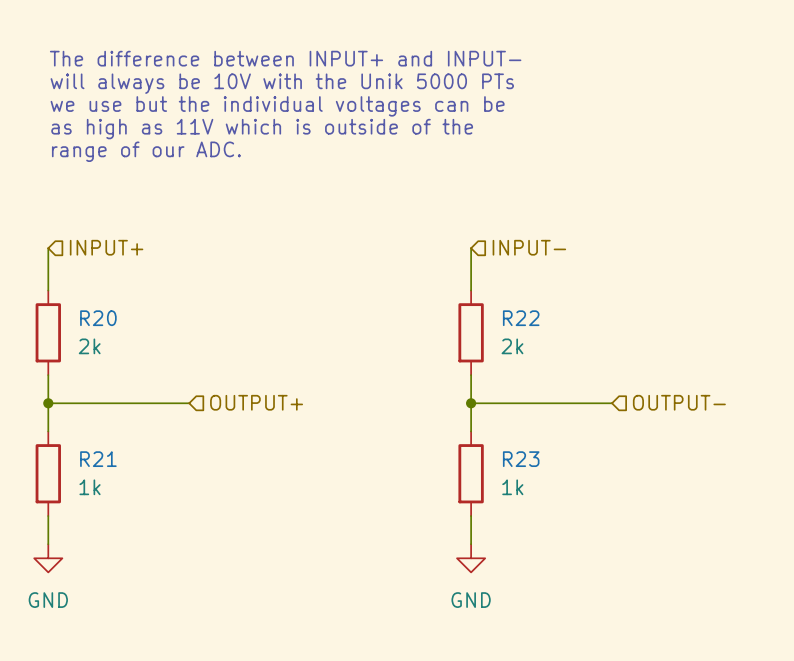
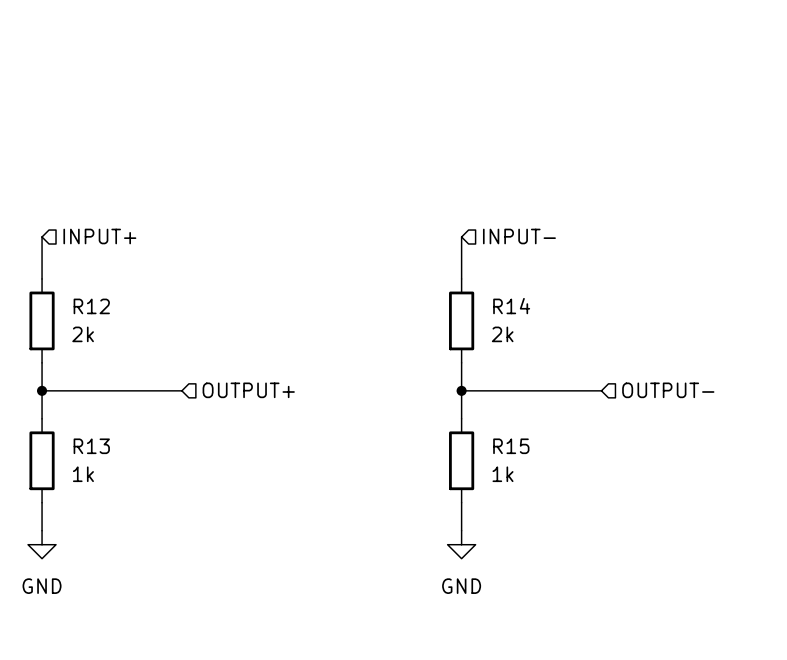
text: The difference between INPUT+ and INPUT- (285, 58) -> none
text: will always be 10V with the Unik 5000 PTs (282, 83) -> none
text: we use but the individual voltages can be (277, 106) -> none
text: as high as 11V which is outside of the (262, 129) -> none
text: range of our ADC. (146, 151) -> none
R20 name: R20 (98, 318) -> R12 (91, 306)
R22 name: R22 (521, 318) -> R14 (511, 306)
R21 name: R21 (98, 459) -> R13 (91, 446)
R23 name: R23 (521, 459) -> R15 (511, 446)

